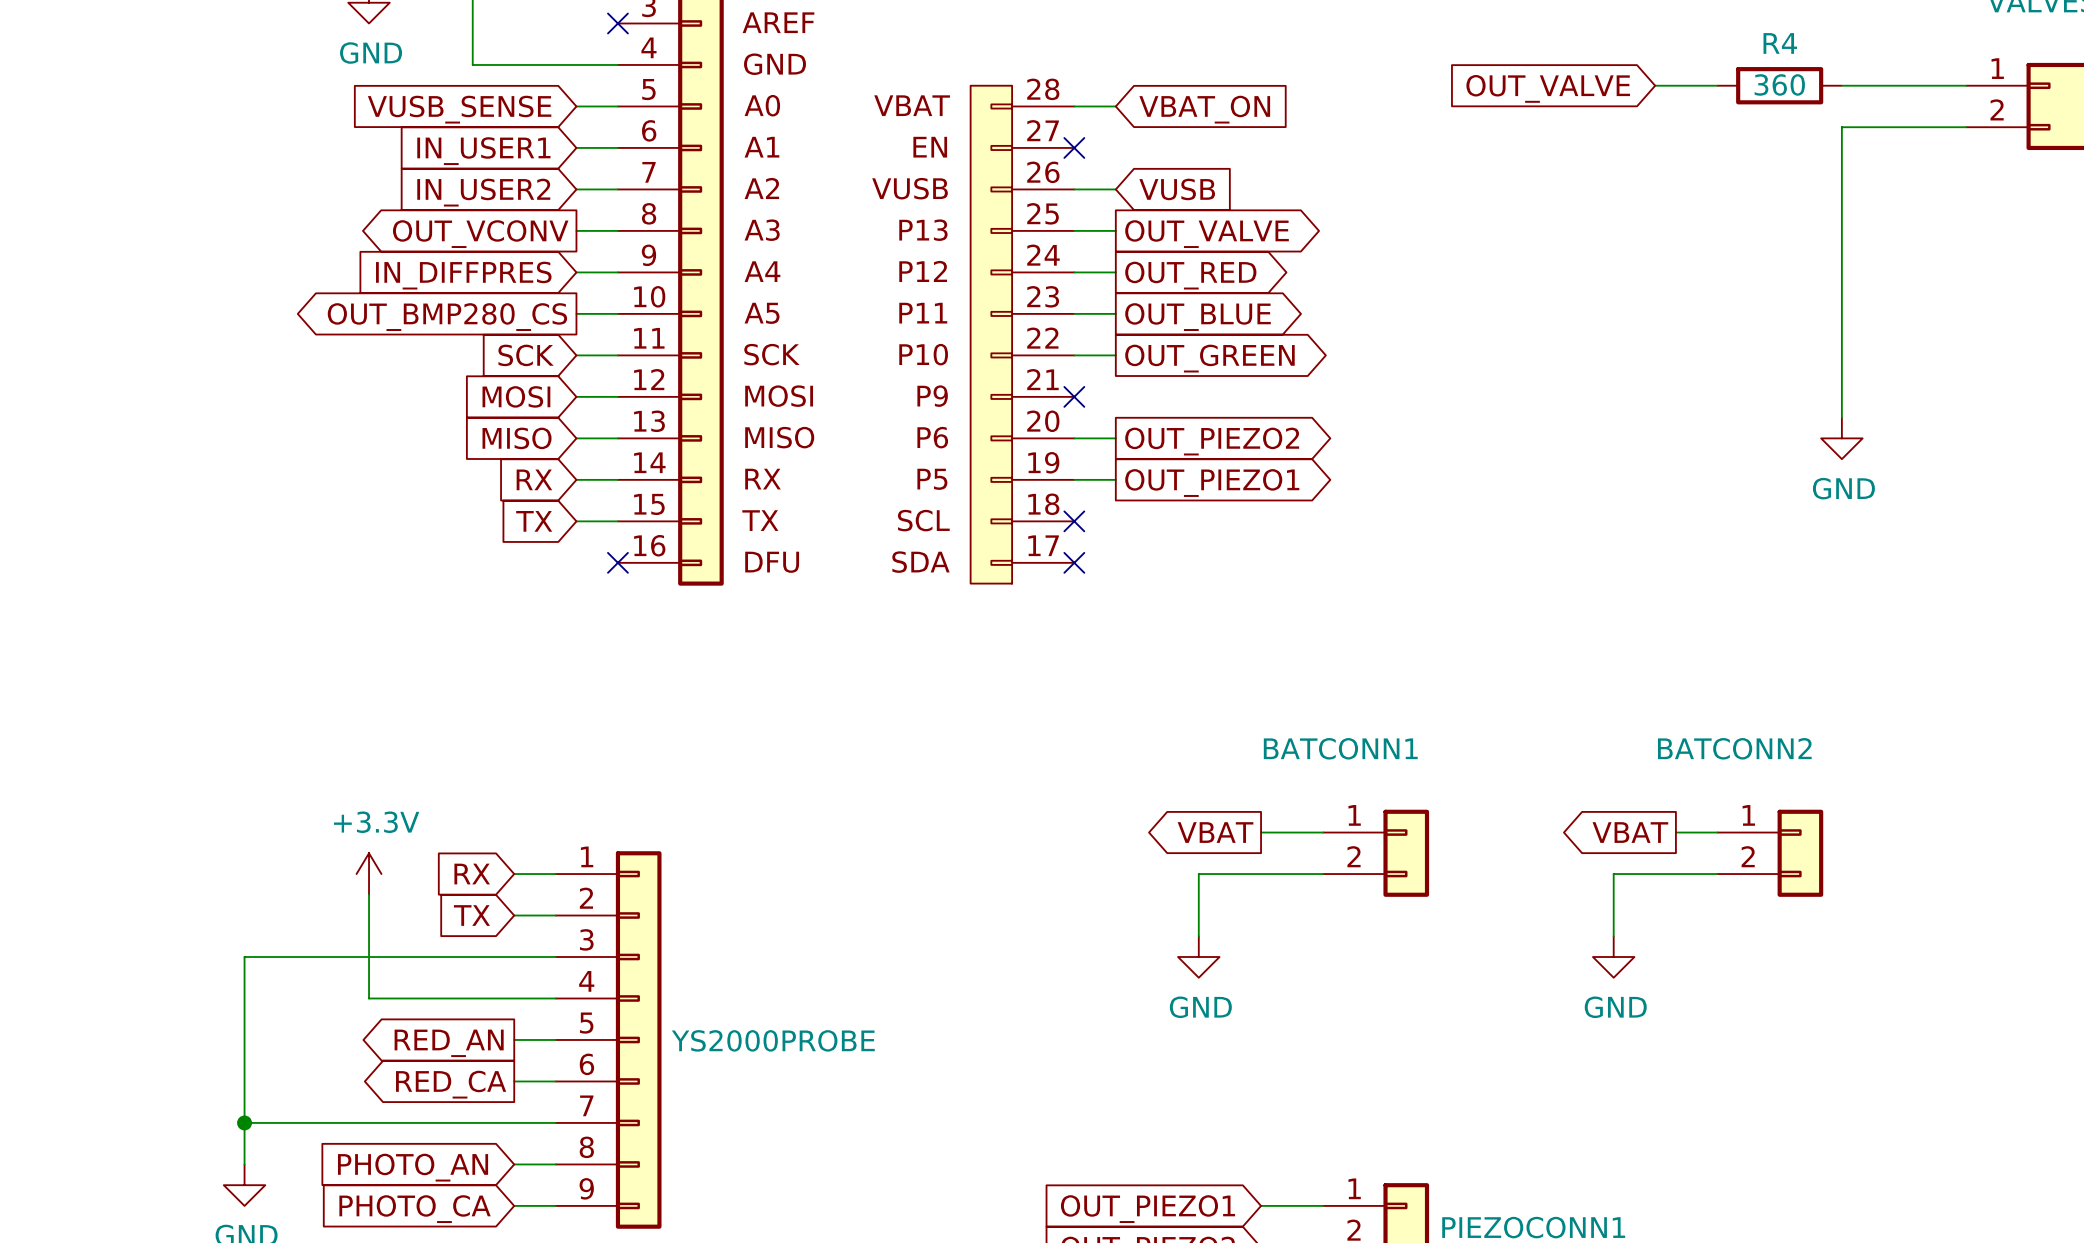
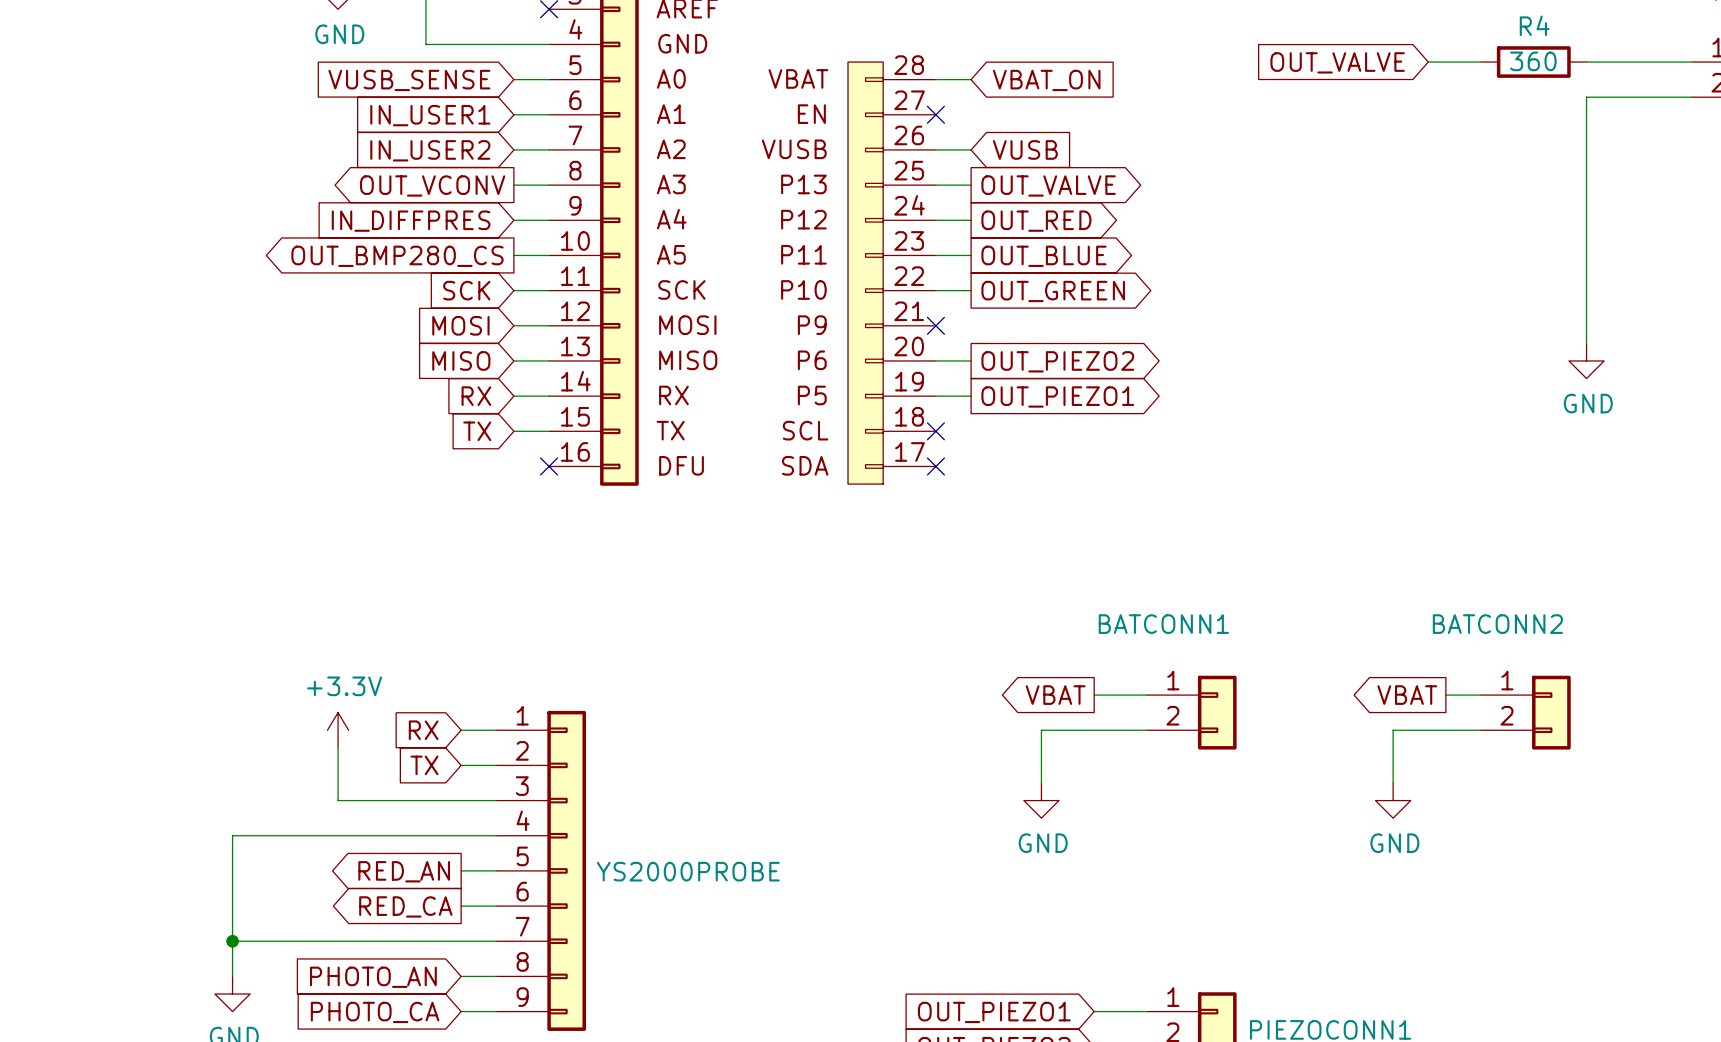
wire: (244, 998) (244, 957) (369, 957) (369, 998) -> (232, 835) (338, 835)

